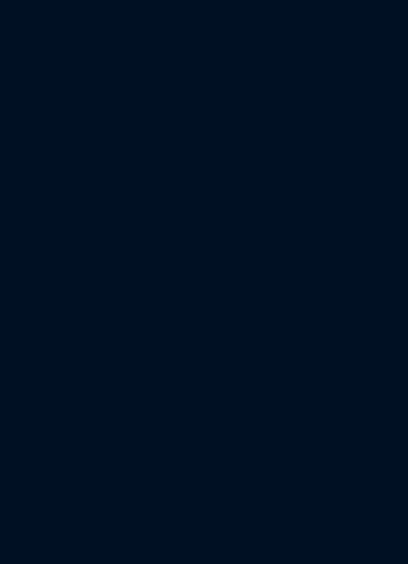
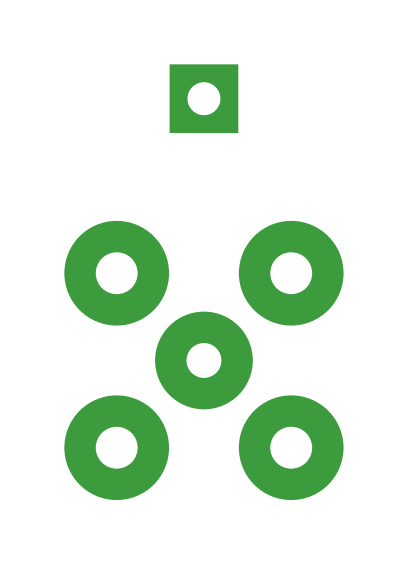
part: none -> (203, 98)
part: none -> (203, 360)

